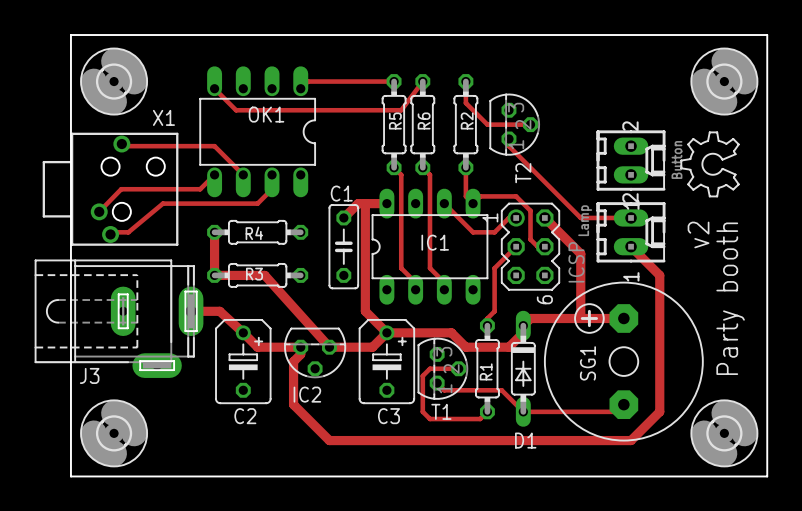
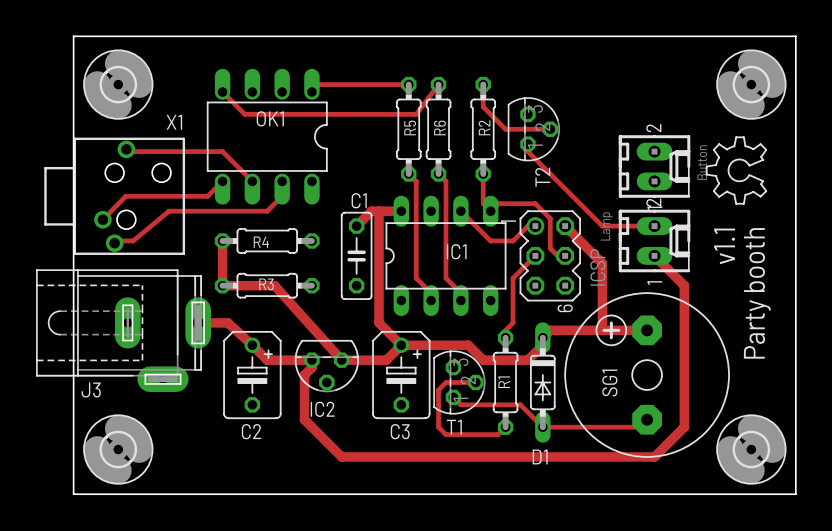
text: v2 (698, 234) -> v1.1 (724, 246)

